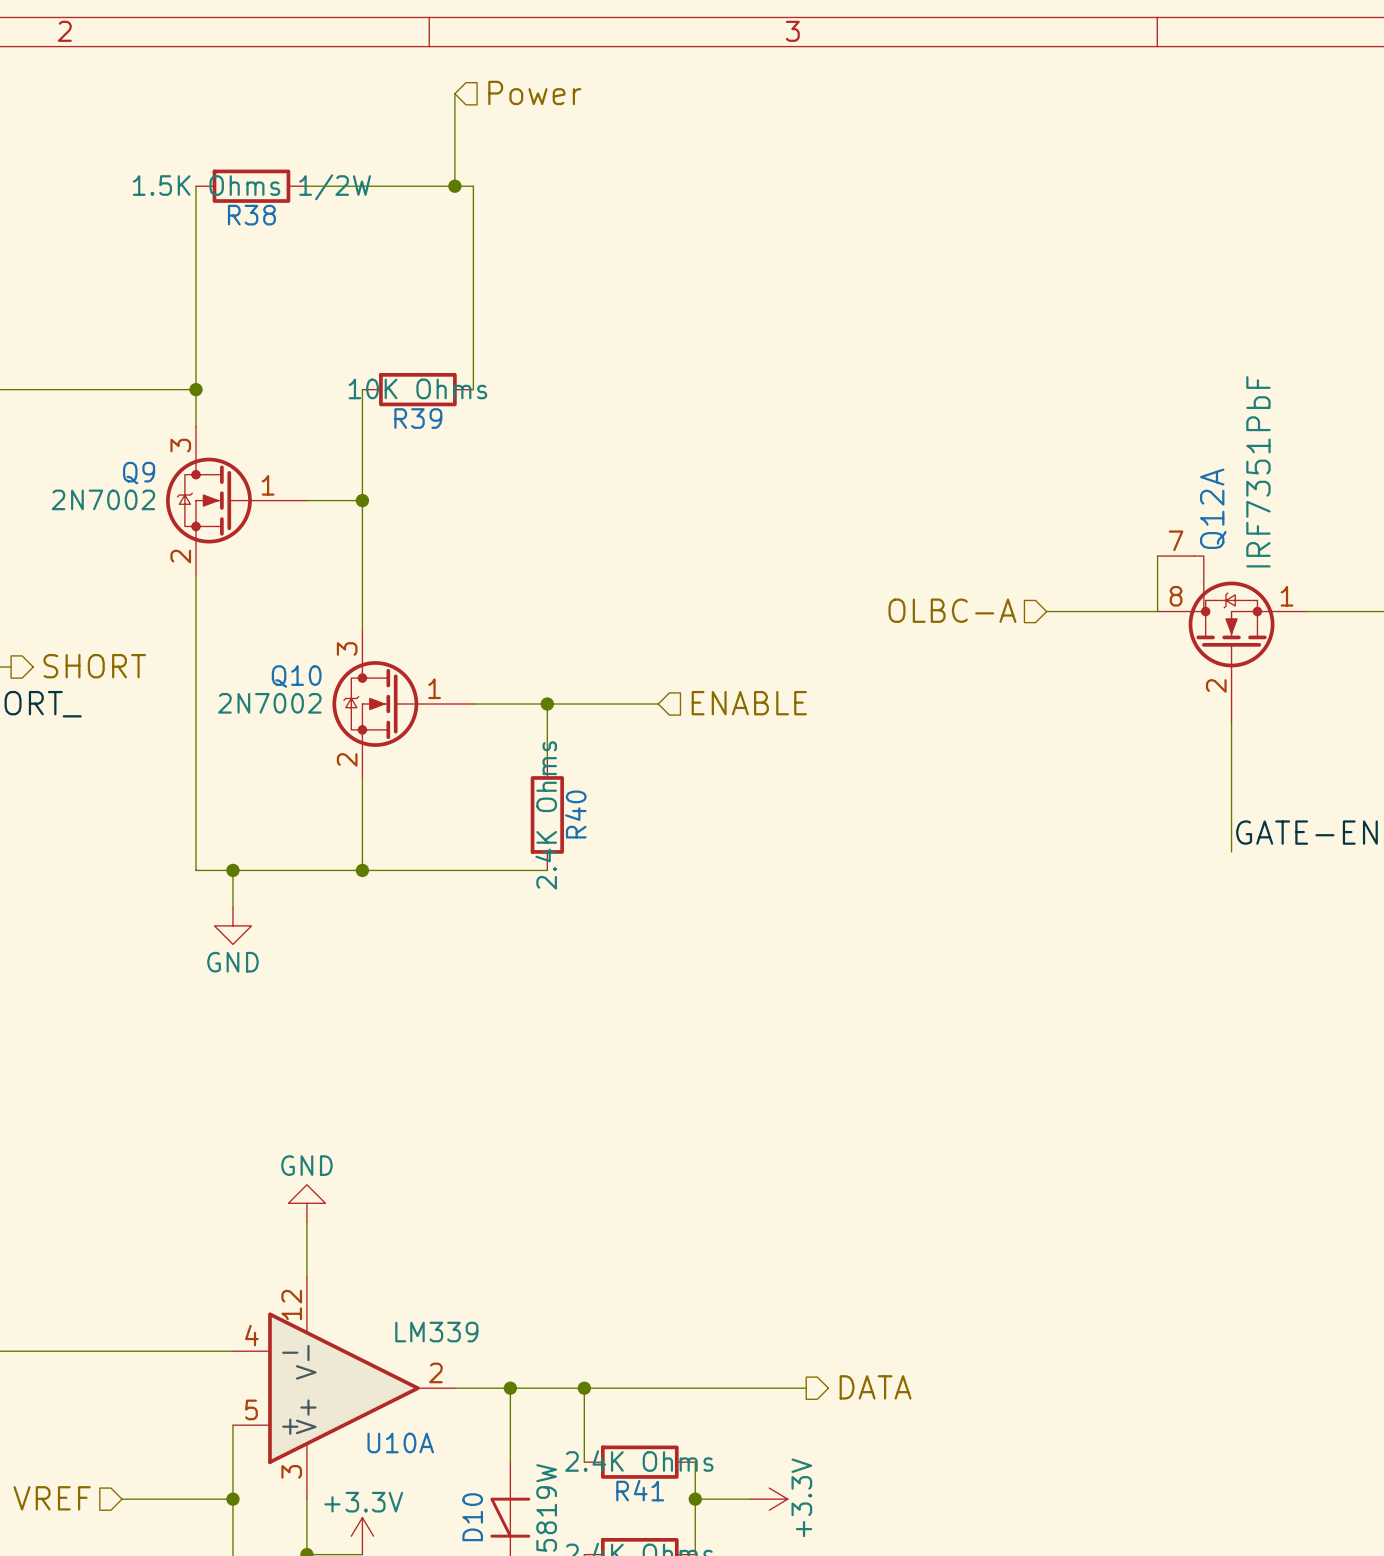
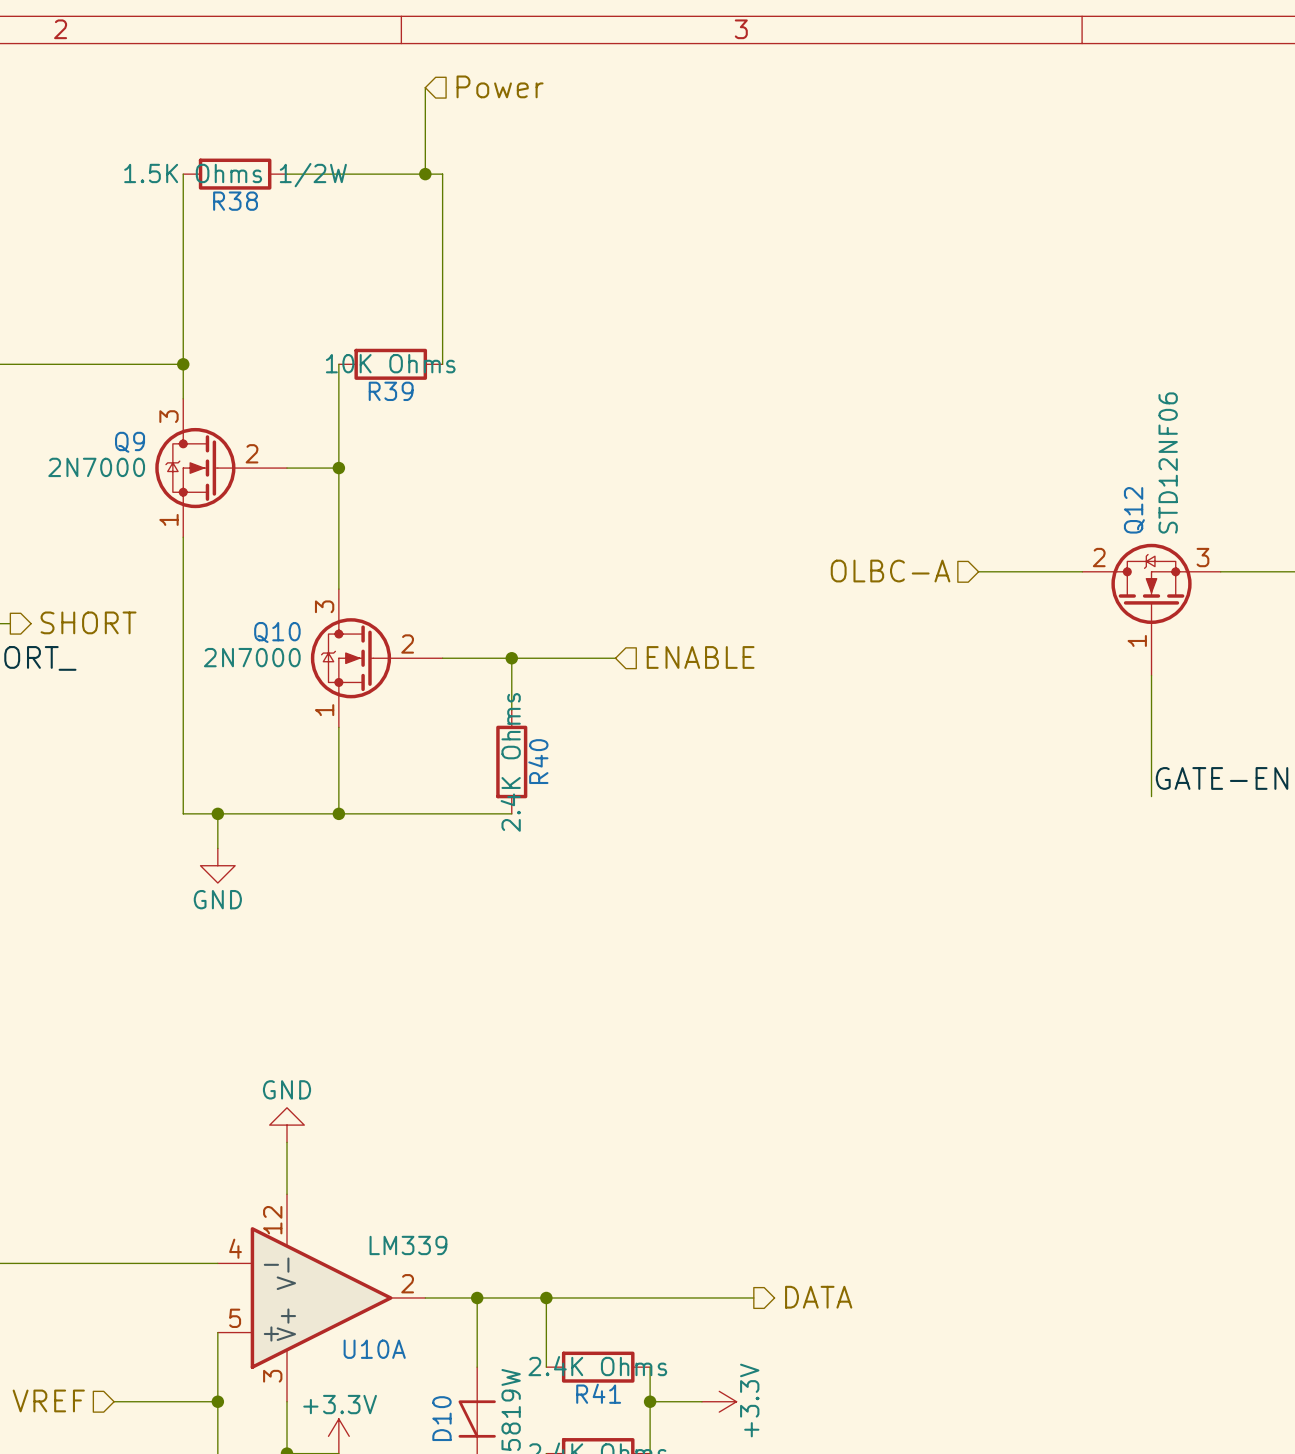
Q9 symbol: [166, 426, 307, 575] -> [155, 398, 288, 538]
Q9 value: 2N7002 (103, 499) -> 2N7000 (96, 467)
wire: (1157, 556) (1157, 611) -> none
Q10 symbol: [332, 630, 474, 778] -> [310, 589, 443, 728]
Q12A: IRF7351PbF (1231, 639) -> none
Q12: none -> STD12NF06 (1151, 609)
Q10 value: 2N7002 (269, 703) -> 2N7000 (252, 657)

